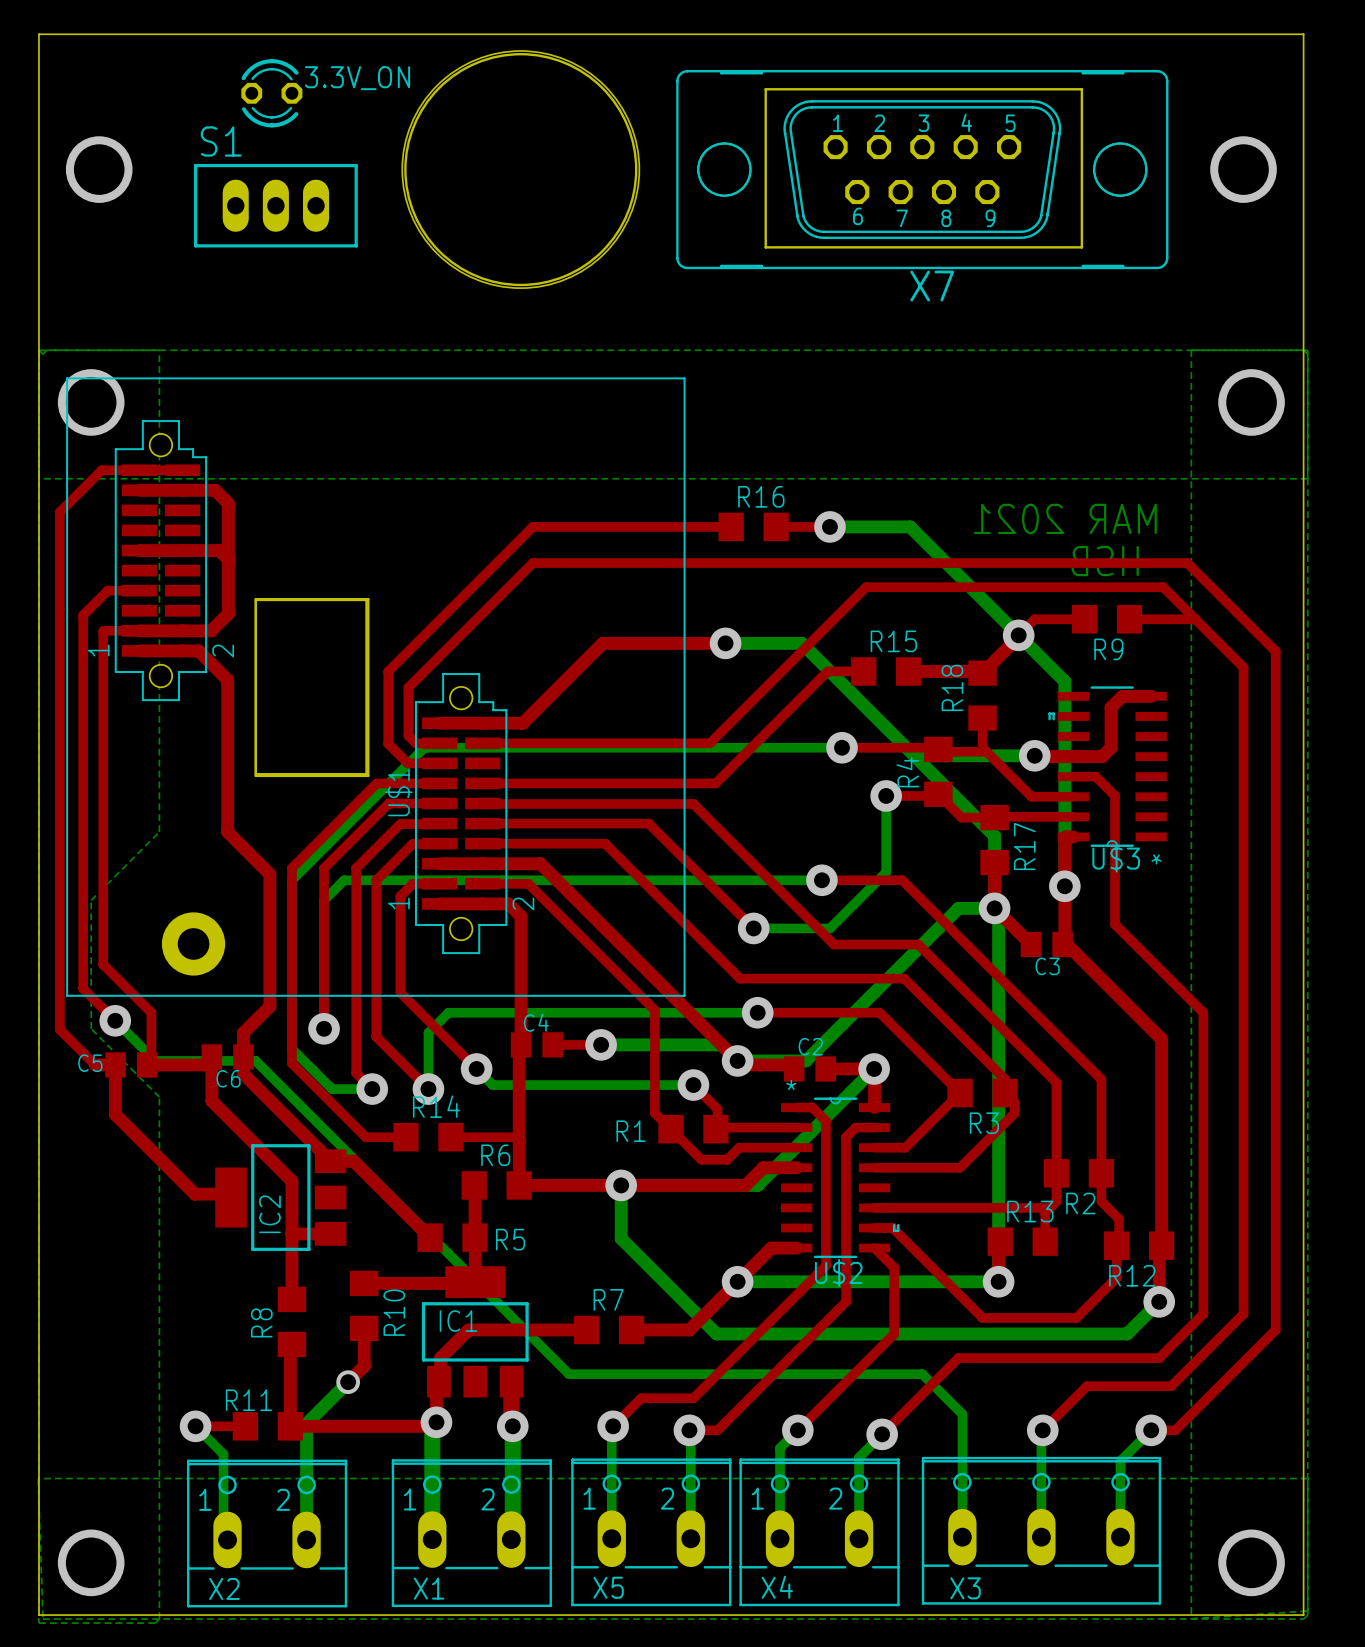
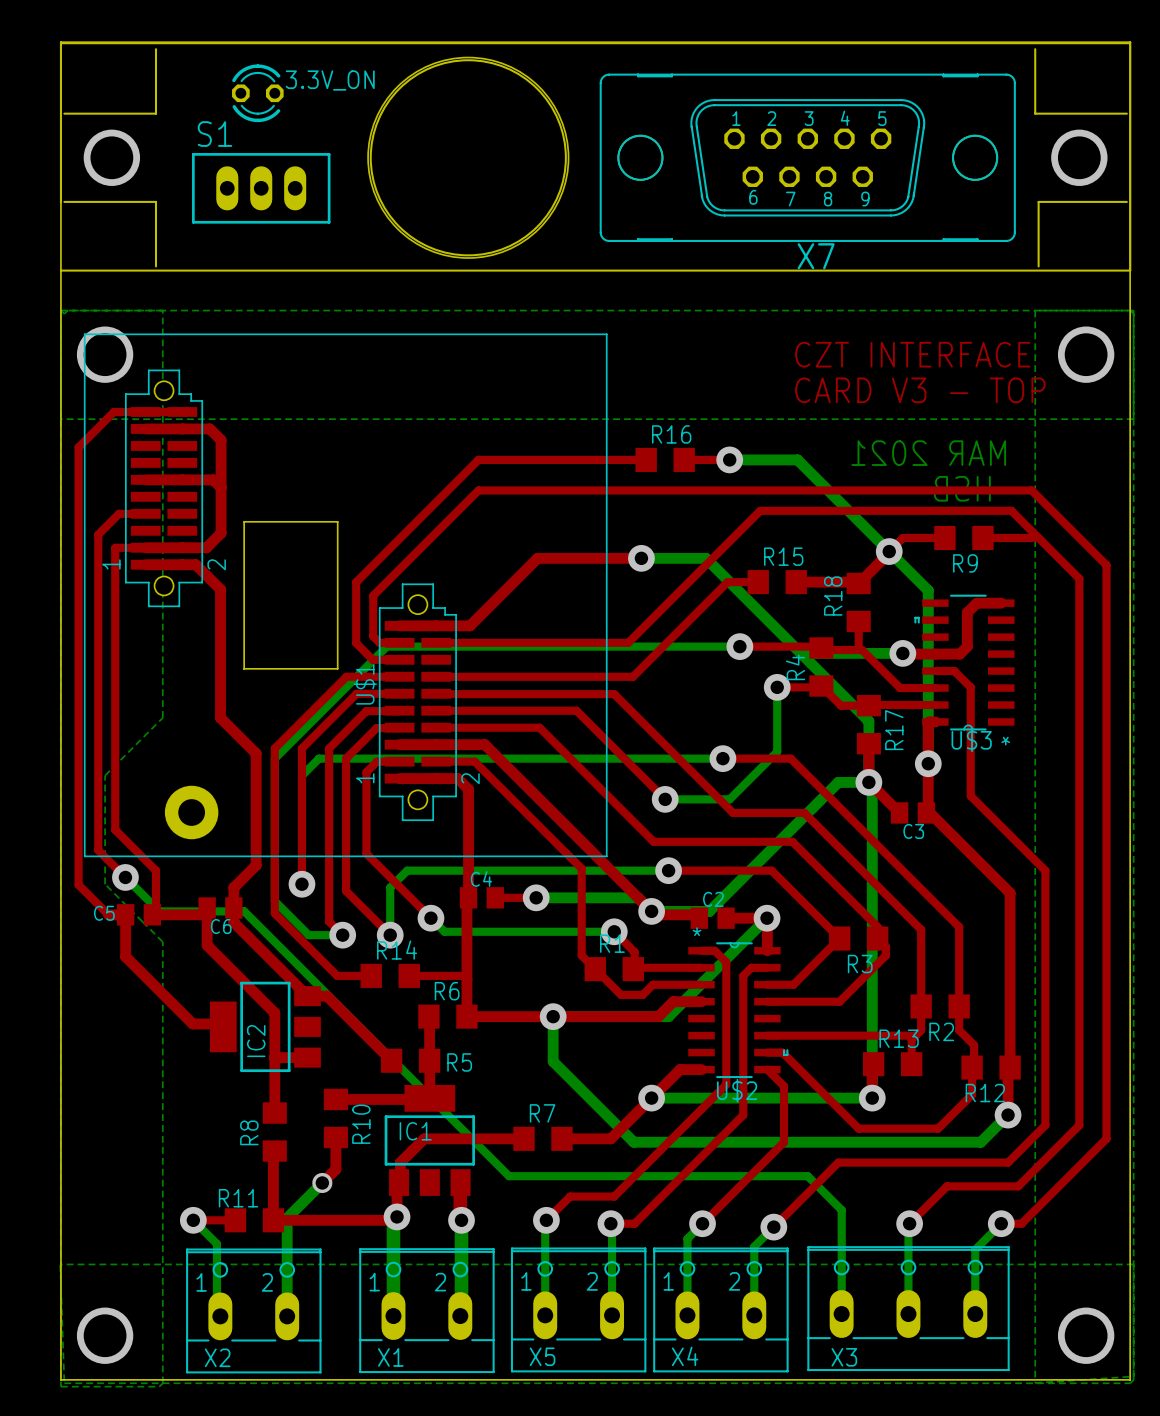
board edge: none -> (156, 49) (156, 113) (64, 113)
board edge: none -> (1035, 49) (1035, 113) (1126, 113)
board edge: (765, 89) (765, 247) (1081, 247) (1081, 89) (765, 89) -> none
board edge: none -> (60, 201) (60, 42) (1130, 42) (1130, 270) (60, 270)
board edge: none -> (64, 201) (156, 201) (156, 266)
board edge: none -> (1126, 201) (1038, 201) (1038, 266)
text: none -> CZT INTERFACE (912, 354)
text: none -> CARD V3 - TOP (920, 390)
board edge: (255, 599) (255, 775) (368, 775) (368, 599) (255, 599) -> none
R1 name position: R1 (631, 1131) -> R1 (612, 943)

